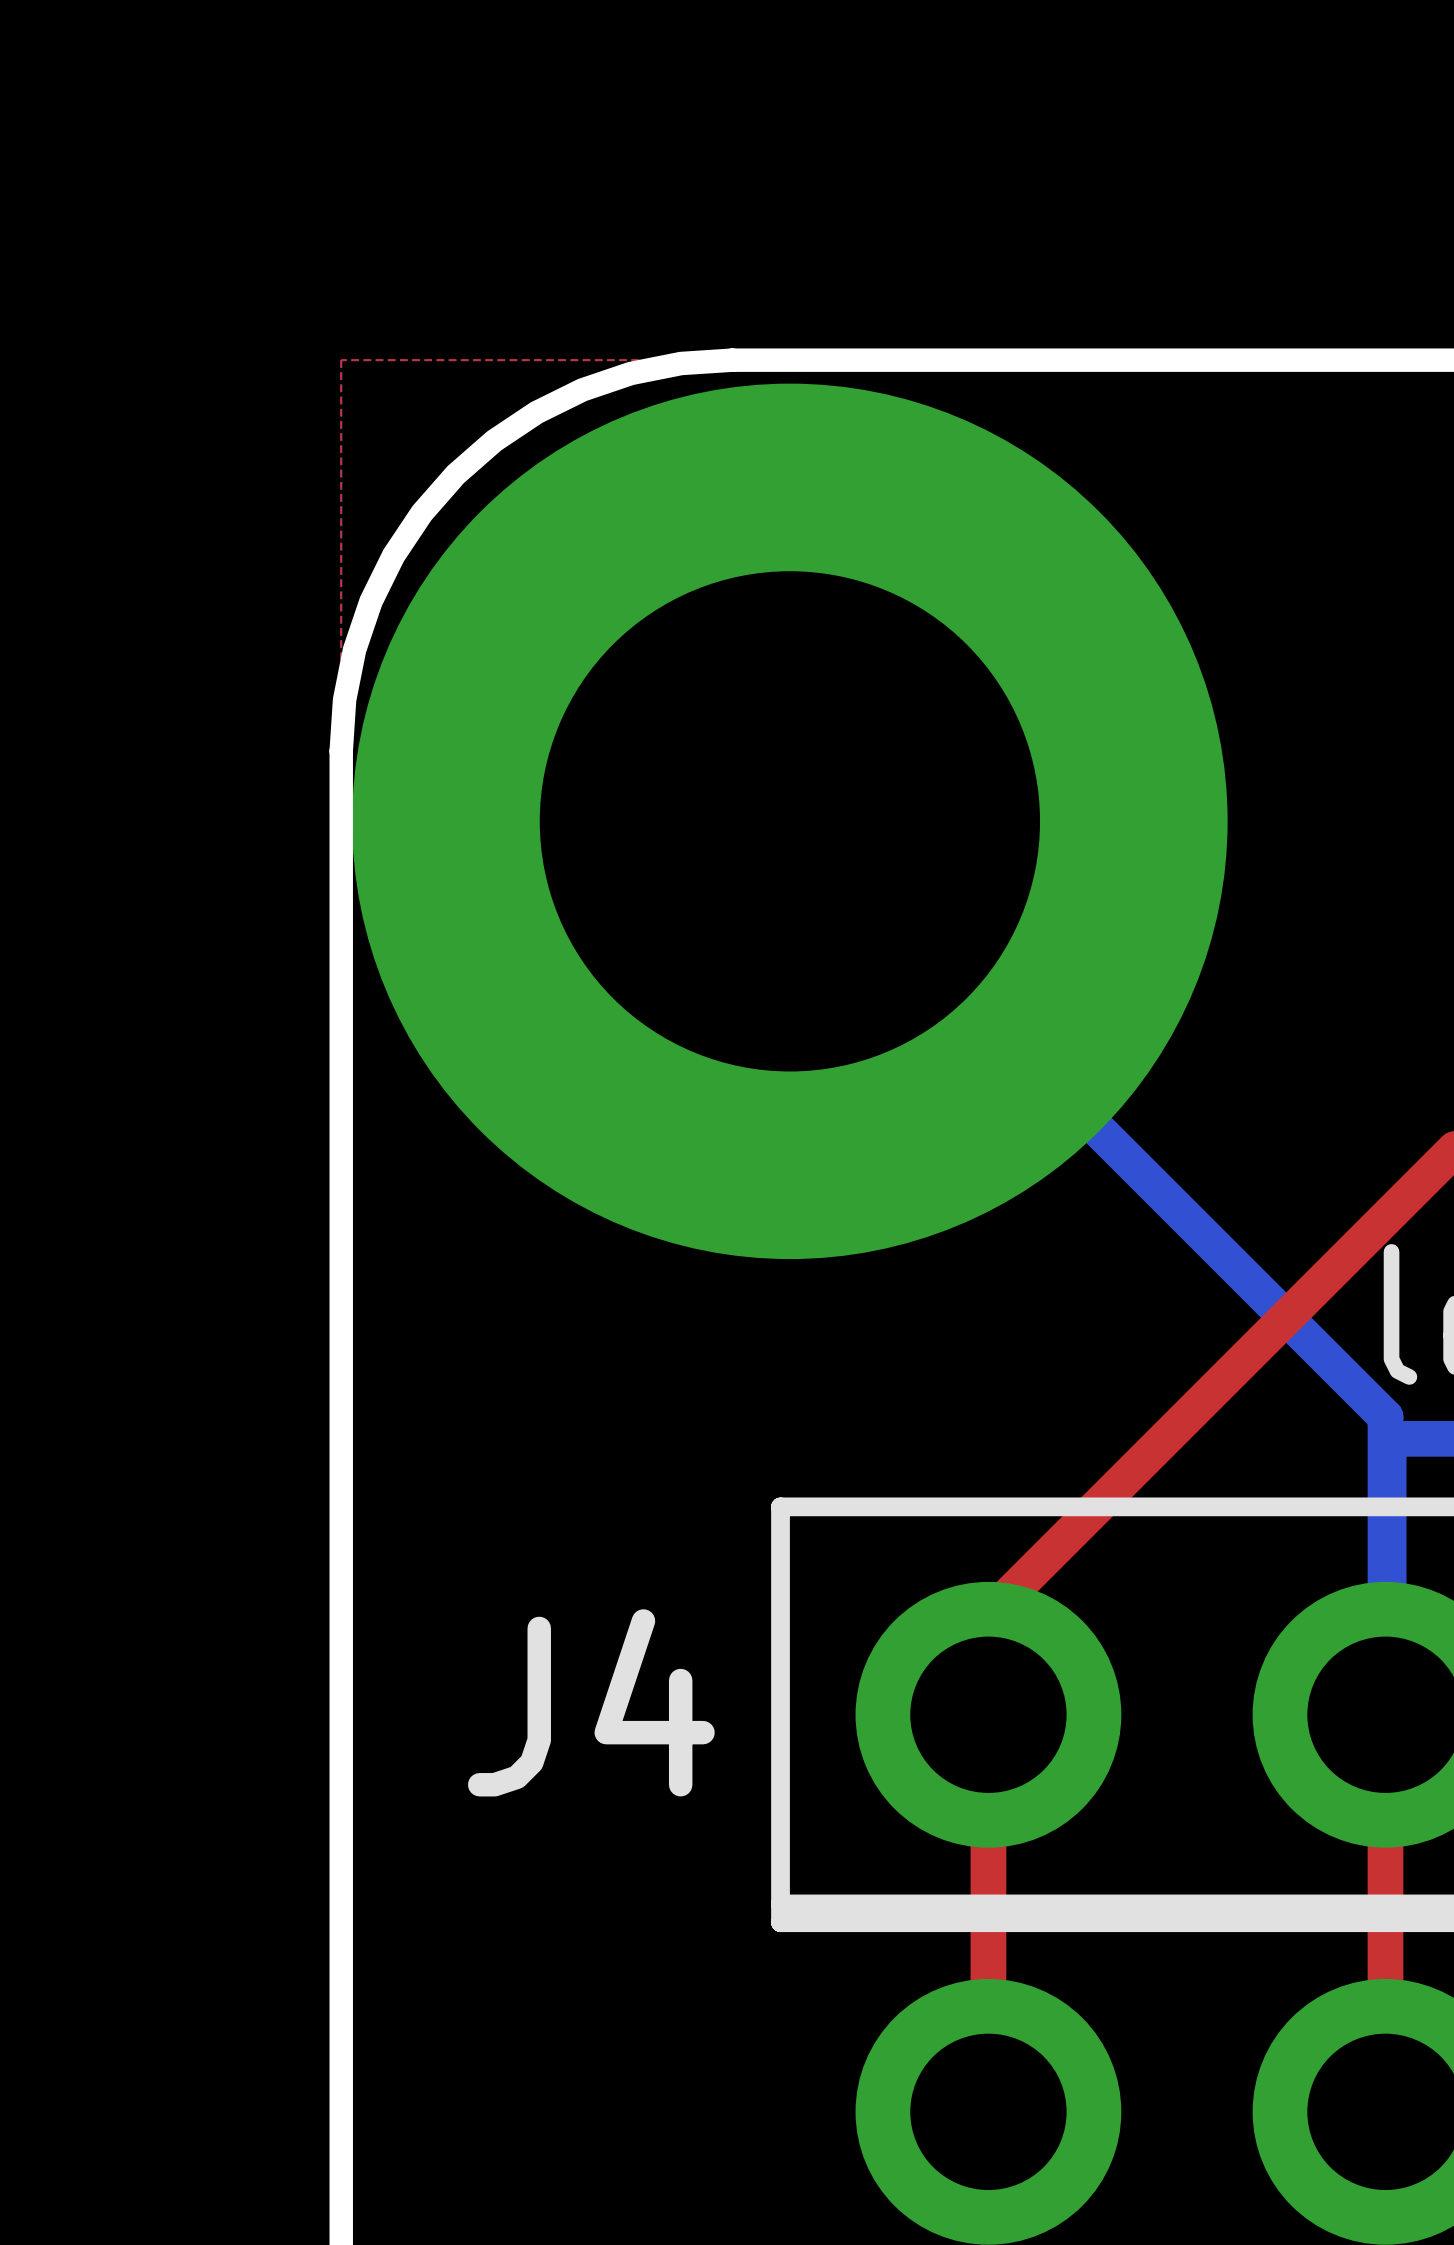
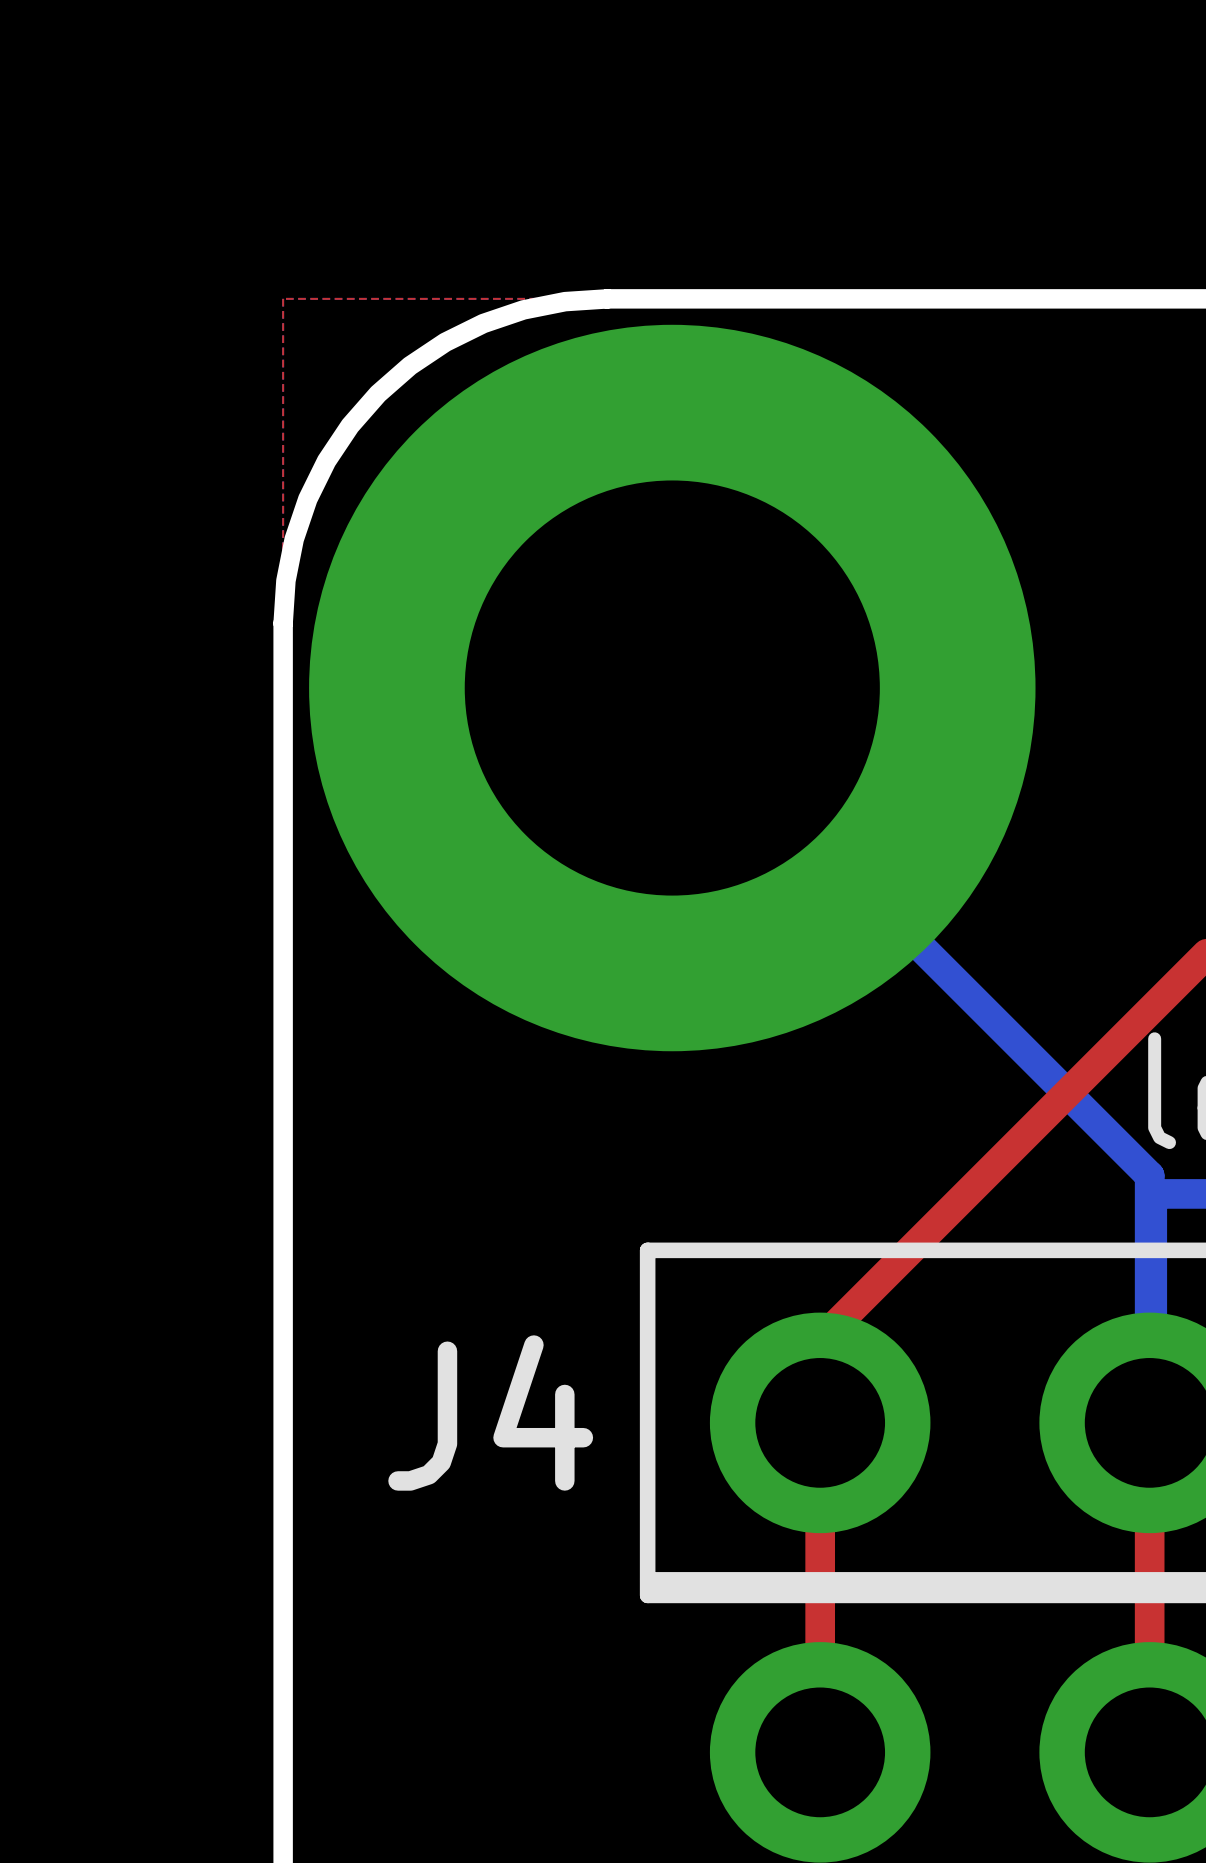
part position: (789, 821) -> (672, 688)

